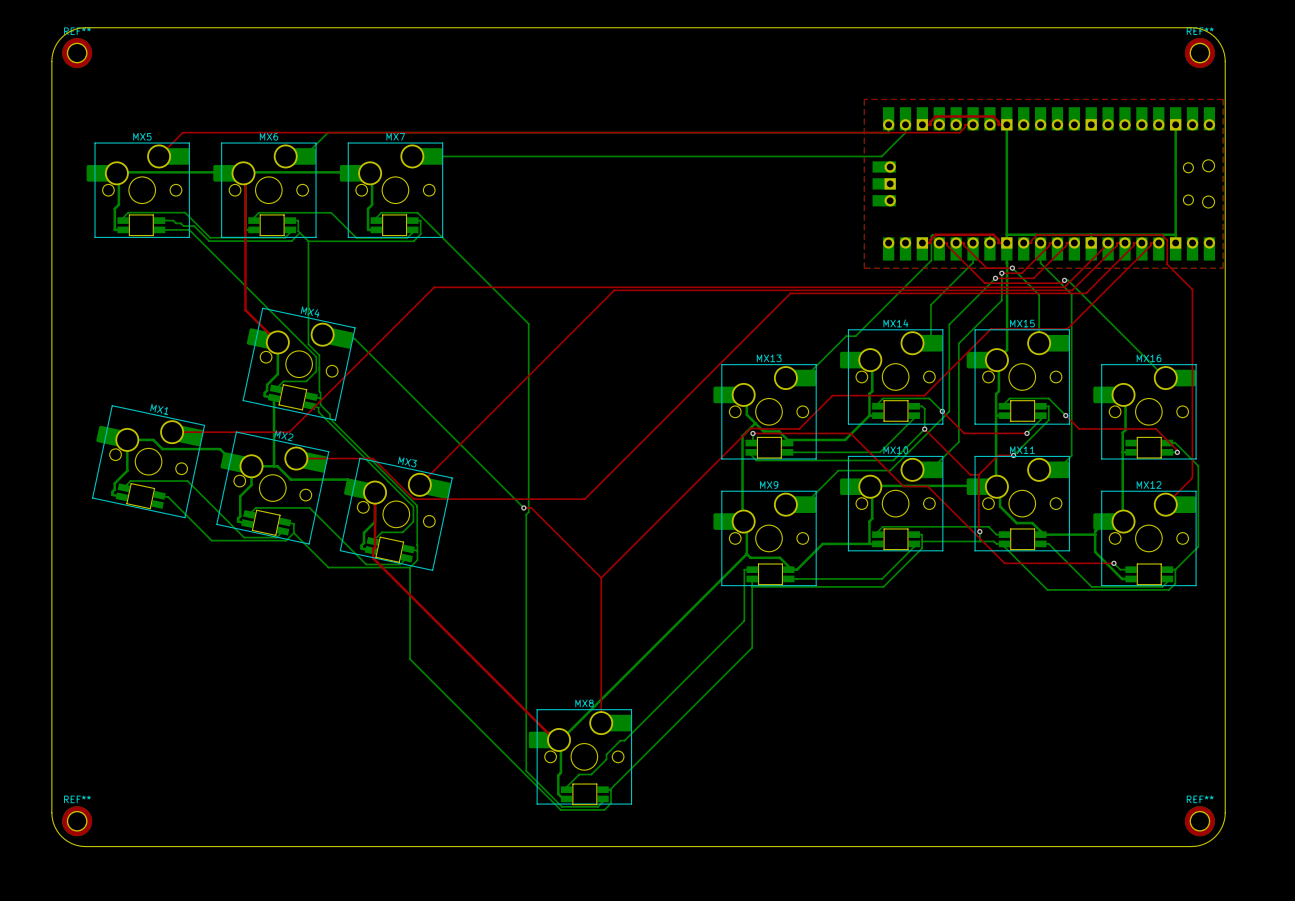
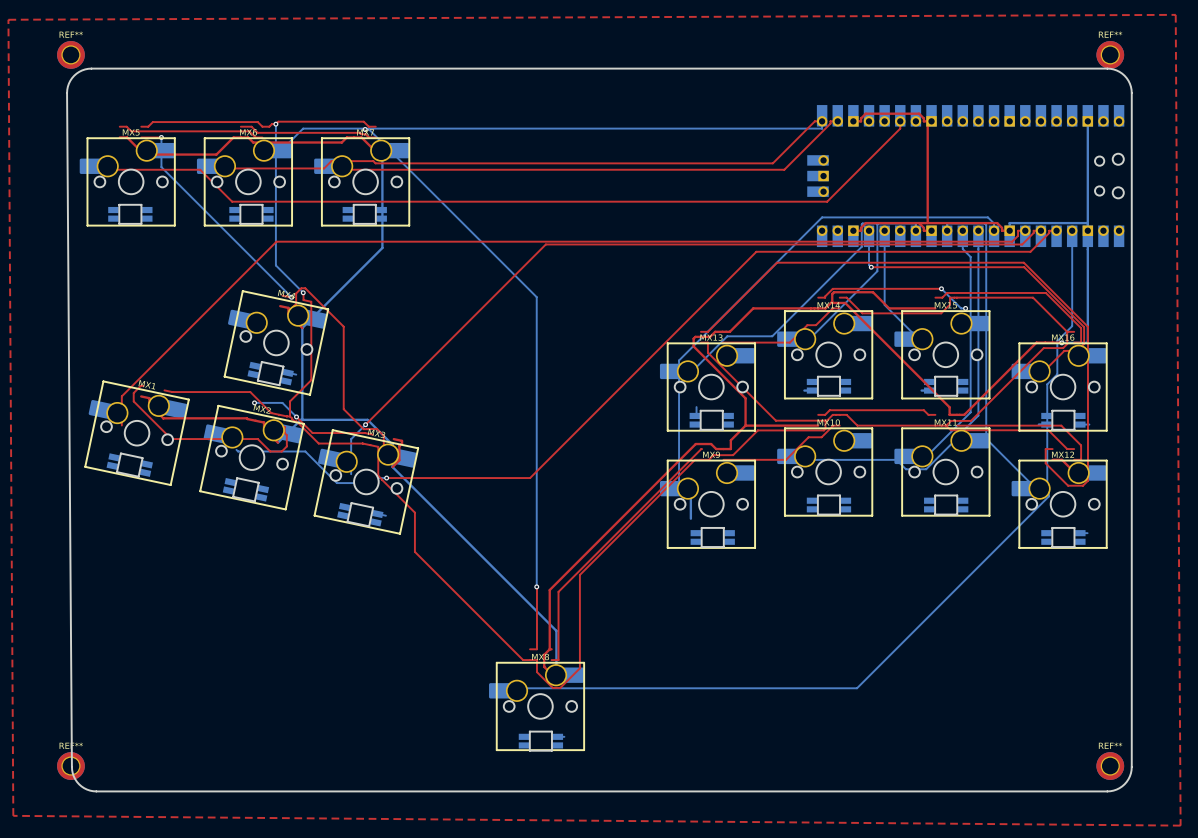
top zone outline: none -> (1175, 14) (8, 19) (13, 815) (1180, 825) (1175, 14)
board edge: (85, 27) (1191, 27) (1202, 29) (1212, 35) (1221, 46) (1225, 61) (1225, 812) (1223, 823) (1217, 833) (1206, 843) (1191, 846) (85, 846) (74, 844) (64, 839) (55, 827) (51, 812) (51, 61) (55, 46) (61, 37) (74, 29) (85, 27) -> (91, 68) (82, 70) (74, 75) (68, 83) (67, 93) (71, 767) (75, 779) (81, 786) (96, 791) (1107, 791) (1119, 788) (1126, 781) (1131, 767) (1131, 93) (1128, 80) (1122, 73) (1107, 68) (91, 68)
top zone outline: (864, 99) (1223, 99) (1223, 268) (864, 268) (864, 99) -> none
top track: none -> (822, 121) (814, 121) (772, 163) (375, 163) (373, 161) (331, 161) (324, 168) (227, 168) (225, 170)
top track: none -> (837, 121) (830, 121) (830, 123) (784, 169) (342, 170)
bottom track: (905, 124) (905, 132) (881, 156) (412, 156) -> none
top track: (973, 124) (965, 124) (959, 132) (182, 132) (159, 156) -> (900, 121) (900, 128) (827, 201) (232, 201) (200, 169) (108, 170)
top track: none -> (927, 121) (927, 223)
bottom track: (1006, 124) (1007, 349) (996, 360) -> none
bottom track: none -> (275, 124) (275, 265) (303, 292)
via: none -> (275, 124)
top track: none -> (119, 126) (126, 126) (131, 131) (249, 131) (255, 137) (262, 137)
top track: none -> (141, 126) (148, 126) (152, 122) (257, 122) (262, 126) (269, 126) (278, 121) (363, 121) (368, 126) (375, 126)
top track: none -> (240, 126) (251, 126) (257, 132) (359, 132) (368, 137) (375, 137)
bottom track: none -> (365, 129) (369, 129) (536, 297) (536, 586)
via: none -> (365, 129)
top track: none -> (119, 137) (127, 137) (144, 154) (216, 154) (233, 137) (248, 137) (253, 142) (341, 142) (346, 137) (361, 137) (378, 154) (381, 154)
top track: none -> (141, 137) (161, 137)
bottom track: none -> (161, 137) (161, 167) (291, 297)
via: none -> (161, 137)
bottom track: none -> (381, 154) (382, 247) (302, 328) (302, 419)
top track: (243, 173) (245, 175) (245, 310) (277, 342) -> none
bottom track: (118, 175) (121, 172) (224, 172) (243, 173) (245, 175) -> none
bottom track: (118, 175) (118, 204) (114, 208) (114, 229) (123, 229) -> none
bottom track: (245, 175) (248, 172) (370, 173) (372, 175) (372, 204) (368, 208) (368, 229) (376, 229) -> none
bottom track: (123, 220) (123, 217) (128, 212) (185, 212) (210, 237) (285, 237) (290, 229) -> none
bottom track: (159, 220) (173, 220) (183, 226) (194, 226) (209, 241) (291, 241) (300, 232) -> none
bottom track: (253, 220) (253, 217) (258, 212) (331, 212) (356, 238) (407, 238) (412, 229) -> none
bottom track: (290, 220) (298, 220) (300, 232) -> none
bottom track: (376, 220) (376, 217) (381, 212) (417, 212) (528, 323) (526, 771) (562, 806) (597, 806) (603, 798) -> none
bottom track: (412, 220) (420, 220) (420, 234) (413, 241) (308, 241) -> none
bottom track: (159, 229) (189, 229) (316, 356) (316, 371) (306, 381) (283, 381) (275, 388) -> none
bottom track: (300, 232) (308, 241) -> none
top track: none -> (919, 223) (997, 223) (1002, 227) (1002, 230) (1009, 230)
bottom track: (1006, 234) (1091, 234) -> none
bottom track: none -> (878, 223) (877, 271) (805, 343)
bottom track: (308, 241) (308, 344) (319, 355) (320, 404) (330, 414) (330, 418) (416, 505) (417, 560) (410, 567) -> none
top track: (939, 242) (947, 242) (947, 245) (984, 283) (1061, 283) (1064, 280) -> none
bottom track: none -> (869, 230) (869, 264) (871, 267)
top track: (956, 242) (964, 242) (964, 245) (986, 268) (1012, 268) -> none
bottom track: none -> (884, 230) (884, 304) (922, 343)
bottom track: (973, 242) (973, 262) (930, 304) (930, 343) (912, 343) -> none
top track: (1023, 242) (1031, 242) (1037, 235) (1162, 235) (1167, 240) (1167, 264) (1192, 289) (1192, 478) (1165, 504) -> none
bottom track: none -> (947, 230) (947, 223) (986, 224) (986, 438) (1039, 492)
top track: (1057, 242) (1049, 242) (1049, 245) (1021, 273) (1001, 273) -> none
bottom track: none -> (978, 230) (978, 415) (926, 469) (905, 469) (896, 459) (805, 460)
top track: (1074, 242) (1066, 242) (1066, 245) (1033, 278) (995, 278) -> none
bottom track: none -> (994, 230) (994, 223) (987, 217) (822, 217) (679, 360) (679, 483) (688, 492)
top track: (1108, 242) (1064, 287) (434, 287) (289, 432) (172, 432) -> (1025, 230) (1018, 230) (1018, 235) (1012, 241) (276, 241) (121, 396) (121, 425)
top track: (1158, 242) (1150, 242) (1150, 245) (1067, 329) (990, 329) (924, 395) (832, 395) (799, 428) (750, 428) (601, 577) -> none
bottom track: none -> (1072, 230) (1072, 326) (1057, 341) (1057, 374) (1047, 384) (1048, 496) (857, 688) (523, 688) (517, 694)
bottom track: none -> (1087, 230) (1087, 342) (1061, 342)
top track: (1104, 257) (1072, 290) (614, 290) (419, 484) -> (1022, 244) (545, 244) (365, 424)
bottom track: (931, 260) (855, 336) (846, 336) (804, 378) (785, 378) -> (861, 246) (772, 336) (727, 336) (688, 375)
bottom track: (1040, 262) (1071, 294) (1071, 455) (1057, 469) (1039, 469) -> (962, 249) (970, 256) (970, 412) (922, 460)
top track: (1113, 265) (1086, 293) (790, 293) (584, 499) (413, 499) (373, 458) (296, 458) -> (1030, 251) (756, 251) (530, 478) (386, 478)
bottom track: (1012, 268) (1039, 294) (1039, 343) (1057, 343) -> none
via: (1012, 268) -> none
bottom track: (1001, 273) (1001, 300) (958, 343) (958, 441) (930, 469) (912, 469) -> none
via: (1001, 273) -> none
bottom track: (995, 278) (949, 324) (949, 411) (890, 470) (838, 470) (804, 504) (785, 504) -> none
via: (995, 278) -> none
bottom track: (1064, 280) (1068, 280) (1165, 378) (1184, 378) -> none
via: (1064, 280) -> none
top track: none -> (871, 267) (1024, 267) (1084, 327) (1084, 343) (1077, 350) (1064, 350) (1039, 375)
via: none -> (871, 267)
top track: none -> (941, 288) (832, 288) (825, 297) (818, 297)
bottom track: none -> (941, 288) (961, 308) (965, 308)
via: none -> (941, 288)
top track: none -> (303, 292) (303, 300) (311, 301) (311, 380) (290, 401) (290, 416)
via: none -> (303, 292)
top track: none -> (282, 295) (291, 297)
via: none -> (291, 297)
top track: none -> (839, 297) (846, 297) (862, 313) (941, 313) (950, 304) (950, 297) (1033, 297) (1067, 331)
top track: none -> (935, 297) (942, 297) (947, 292) (1045, 292) (1081, 328) (1081, 342) (1074, 342)
top track: none -> (832, 302) (825, 308) (753, 308) (729, 331) (715, 331) (710, 336) (695, 336) (693, 338) (693, 346) (745, 398) (745, 425)
top track: none -> (832, 302) (845, 302) (949, 407) (949, 414) (964, 414) (1036, 342) (1061, 342)
top track: none -> (832, 302) (834, 292) (873, 292) (889, 308) (935, 308)
top track: none -> (280, 306) (288, 307) (288, 314) (302, 328)
top track: none -> (839, 308) (832, 308) (816, 325) (807, 325) (789, 342) (722, 342)
via: none -> (965, 308)
top track: none -> (301, 310) (293, 308) (293, 306) (296, 303) (296, 293) (301, 288) (305, 288) (343, 326) (343, 409) (363, 429) (377, 429) (383, 435) (383, 448) (391, 449)
bottom track: (322, 334) (326, 338) (354, 338) (523, 507) -> none
bottom track: (259, 338) (274, 338) (277, 342) (277, 374) (267, 384) (267, 390) (264, 393) (264, 396) (274, 398) (274, 466) -> none
top track: none -> (700, 331) (707, 331) (777, 262) (1023, 262) (1087, 326) (1087, 480) (1083, 485) (1068, 485) (1045, 463) (1045, 449) (1052, 449)
top track: none -> (1067, 331) (1067, 344) (1063, 348) (1043, 348) (970, 420) (951, 420) (946, 425)
top track: none -> (1067, 331) (1074, 331)
bottom track: (851, 360) (870, 360) (872, 362) (872, 391) (869, 393) (869, 415) (845, 440) (787, 440) -> none
bottom track: (996, 360) (998, 362) (998, 391) (996, 393) (996, 486) -> none
top track: none -> (700, 342) (707, 342) (707, 352) (775, 420) (826, 420) (832, 414) (846, 414) (857, 425) (946, 425) (950, 430) (1048, 430) (1067, 449) (1074, 449)
via: none -> (1061, 342)
bottom track: (725, 394) (743, 394) (746, 398) (746, 414) (763, 431) (779, 431) (787, 440) -> none
bottom track: (1105, 394) (1123, 394) (1125, 396) (1125, 429) (1122, 432) (1122, 520) (1105, 520) (1095, 531) (1095, 551) (1122, 578) (1130, 578) -> none
bottom track: (309, 405) (318, 407) (318, 411) (413, 506) (413, 521) (402, 532) (381, 532) (372, 541) -> none
bottom track: (877, 406) (883, 398) (929, 398) (942, 411) -> none
bottom track: (914, 406) (922, 406) (924, 408) (924, 429) (893, 460) (756, 460) (751, 455) (751, 452) -> none
bottom track: (1004, 406) (1009, 398) (1048, 398) (1065, 415) -> none
bottom track: (1040, 406) (1048, 406) (1048, 420) (1013, 455) -> none
top track: none -> (143, 385) (140, 385) (133, 393) (133, 401) (171, 439) (257, 439) (270, 451) (281, 451) (286, 446) (286, 435) (284, 433) (284, 426) (276, 425)
top track: (942, 411) (964, 433) (1027, 433) -> none
via: (942, 411) -> none
top track: none -> (164, 390) (172, 392) (250, 392) (271, 413) (290, 416)
bottom track: (914, 415) (914, 418) (880, 452) (787, 452) -> none
bottom track: (1040, 415) (1040, 419) (1027, 433) -> none
top track: (1065, 415) (1079, 428) (1155, 428) (1177, 452) -> none
via: (1065, 415) -> none
top track: none -> (141, 396) (149, 398) (149, 404) (163, 418) (246, 418) (264, 422) (264, 428) (277, 442)
bottom track: (755, 423) (742, 436) (742, 521) -> none
bottom track: none -> (254, 402) (282, 402) (296, 416)
via: none -> (254, 402)
top track: (924, 429) (970, 474) (978, 474) -> none
via: (924, 429) -> none
top track: (752, 433) (850, 433) (903, 486) (927, 486) (1004, 563) (1113, 563) -> none
via: (752, 433) -> none
via: (1027, 433) -> none
bottom track: (109, 436) (113, 439) (153, 439) (162, 449) (220, 449) (237, 466) (277, 466) (290, 479) (347, 479) (356, 488) (371, 488) (375, 492) (375, 521) (363, 532) (363, 543) (361, 545) (361, 548) (370, 550) -> none
bottom track: (127, 439) (127, 470) (114, 483) (114, 489) (112, 491) (112, 494) (121, 496) -> none
top track: none -> (818, 414) (825, 414) (829, 410) (923, 410) (928, 414) (935, 414)
top track: none -> (290, 416) (318, 443) (362, 443) (378, 446) (378, 475) (414, 512) (414, 551) (523, 660) (536, 660) (536, 672) (552, 687) (560, 687) (579, 668) (579, 574) (695, 459) (708, 459) (713, 455) (733, 455) (757, 430) (824, 430) (825, 420)
bottom track: (1167, 443) (1175, 443) (1198, 466) (1198, 546) (1175, 569) (1175, 583) (1168, 589) (1047, 589) (1004, 546) (1004, 543) (996, 543) (994, 541) (922, 541) -> none
top track: none -> (296, 416) (312, 433) (372, 434)
via: none -> (296, 416)
bottom track: none -> (365, 424) (351, 439) (351, 474)
via: none -> (365, 424)
via: (1177, 452) -> none
top track: none -> (745, 425) (818, 425)
top track: none -> (745, 425) (730, 440) (730, 449) (716, 449) (711, 444) (695, 444) (549, 590) (549, 649)
top track: none -> (839, 425) (832, 425) (821, 437) (808, 437) (786, 459) (723, 459)
top track: none -> (956, 425) (1061, 425) (1081, 445) (1081, 459) (1074, 459)
top track: (1013, 455) (998, 455) (978, 474) -> none
via: (1013, 455) -> none
bottom track: (251, 466) (251, 484) (240, 496) (240, 516) (238, 518) (238, 521) (247, 523) -> none
top track: none -> (393, 439) (402, 440) (402, 443) (399, 446) (399, 460) (392, 467)
bottom track: none -> (277, 442) (300, 419) (367, 419) (392, 444) (392, 467) (556, 630) (556, 679)
top track: (978, 474) (979, 531) -> none
top track: none -> (701, 449) (558, 591) (558, 660) (551, 660)
bottom track: none -> (236, 449) (238, 451) (305, 451) (336, 483) (359, 483) (364, 478) (386, 478)
bottom track: (123, 487) (130, 481) (187, 481) (244, 537) (276, 537) (283, 531) -> none
bottom track: (872, 488) (872, 518) (869, 521) (869, 543) -> none
bottom track: (872, 488) (875, 485) (996, 486) (1000, 489) (1000, 506) (1016, 523) (1032, 523) (1040, 531) (1040, 534) (1095, 534) -> none
top track: none -> (1052, 459) (1061, 459) (1079, 476)
top track: (375, 492) (375, 547) (373, 549) (373, 558) (554, 739) (559, 739) -> none
bottom track: (159, 495) (168, 497) (211, 540) (286, 540) (293, 532) -> none
top track: (523, 507) (531, 507) (601, 577) -> none
via: (523, 507) -> none
via: none -> (386, 478)
bottom track: (249, 514) (255, 507) (309, 507) (366, 564) (400, 564) (406, 558) -> none
bottom track: (285, 522) (293, 523) (293, 532) -> none
bottom track: (979, 531) (979, 541) -> none
via: (979, 531) -> none
bottom track: (293, 532) (328, 567) (410, 567) -> none
bottom track: (877, 534) (877, 531) (882, 526) (988, 526) (996, 534) (1004, 534) -> none
bottom track: (914, 534) (922, 534) (922, 548) (883, 586) (752, 586) -> none
bottom track: (877, 543) (822, 543) (797, 569) (788, 569) -> none
bottom track: (914, 543) (914, 546) (882, 578) (788, 578) -> none
bottom track: (1040, 543) (1048, 543) (1091, 586) (1162, 586) (1167, 581) (1167, 578) -> none
bottom track: (1113, 563) (1120, 569) (1130, 569) -> none
via: (1113, 563) -> none
bottom track: (410, 567) (410, 659) (560, 809) (604, 809) (610, 803) (610, 789) (752, 647) (752, 578) -> none
bottom track: (752, 569) (744, 569) (744, 620) (624, 740) (620, 740) (606, 754) (606, 759) (591, 774) (579, 774) (566, 787) (566, 789) -> none
bottom track: (791, 569) (779, 557) (750, 557) (746, 554) (559, 740) -> none
top track: (601, 577) (601, 723) -> none
top track: none -> (536, 586) (536, 649) (530, 649)
via: none -> (536, 586)
top track: none -> (549, 649) (551, 649)
top track: none -> (549, 649) (544, 654) (544, 666) (556, 679)
bottom track: (540, 739) (559, 739) (560, 741) (560, 772) (558, 775) (558, 794) (563, 798) (566, 798) -> none

